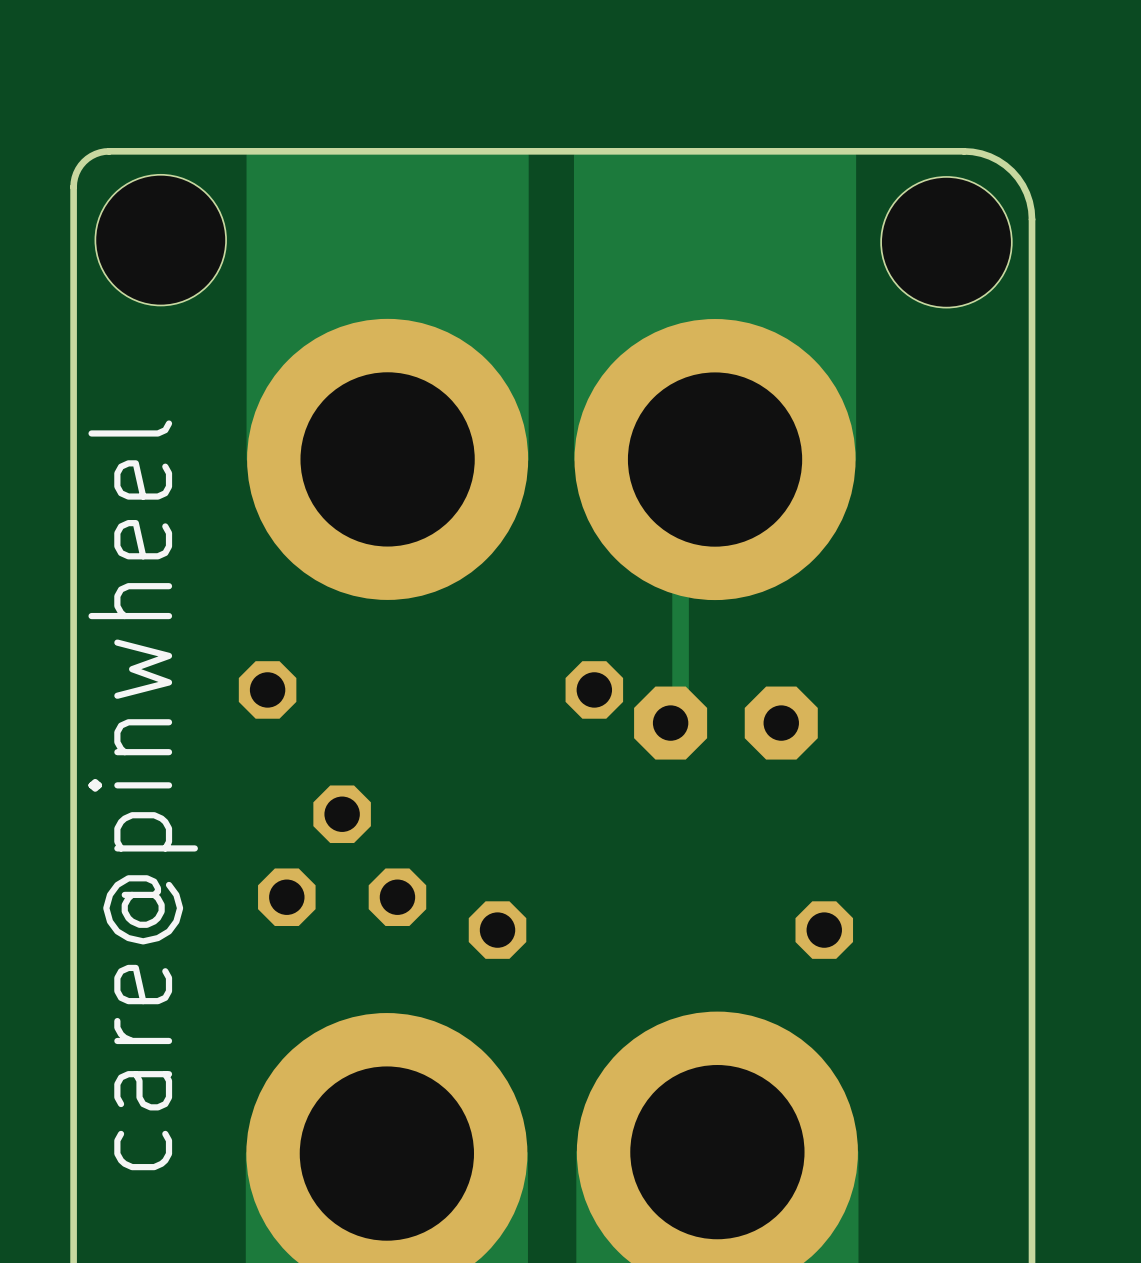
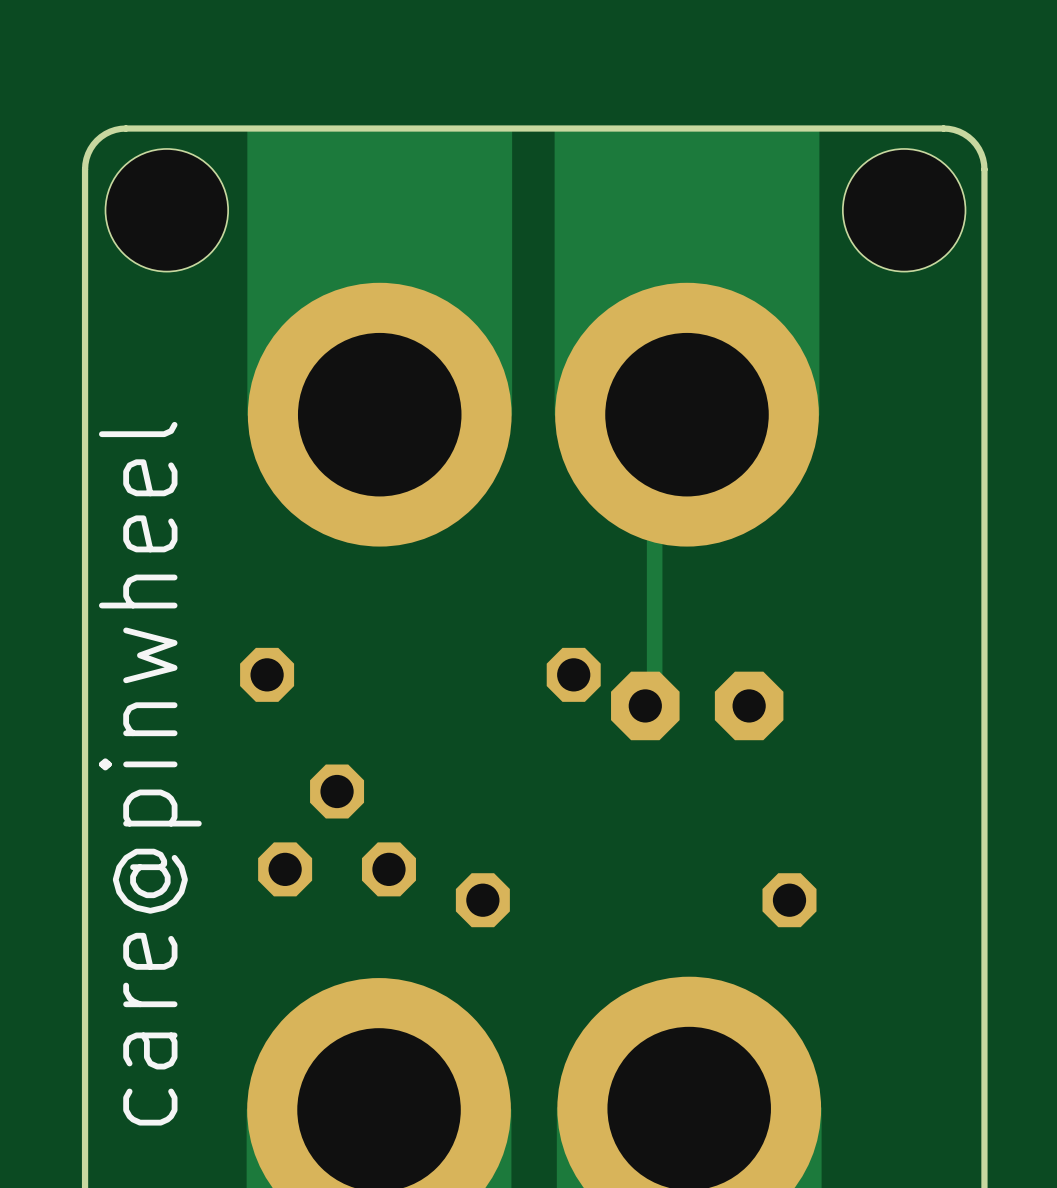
board edge: (73, 186) (76, 173) (84, 161) (95, 154) (109, 151) (963, 151) (990, 156) (1012, 171) (1026, 193) (1032, 219) -> (85, 202) (85, 169) (88, 153) (101, 136) (120, 128) (943, 128) (959, 131) (968, 136) (981, 153) (984, 169) (984, 233)
hole position: (160, 240) -> (166, 210)
hole position: (946, 242) -> (904, 210)
part position: (387, 376) -> (379, 336)
part position: (715, 376) -> (687, 336)

